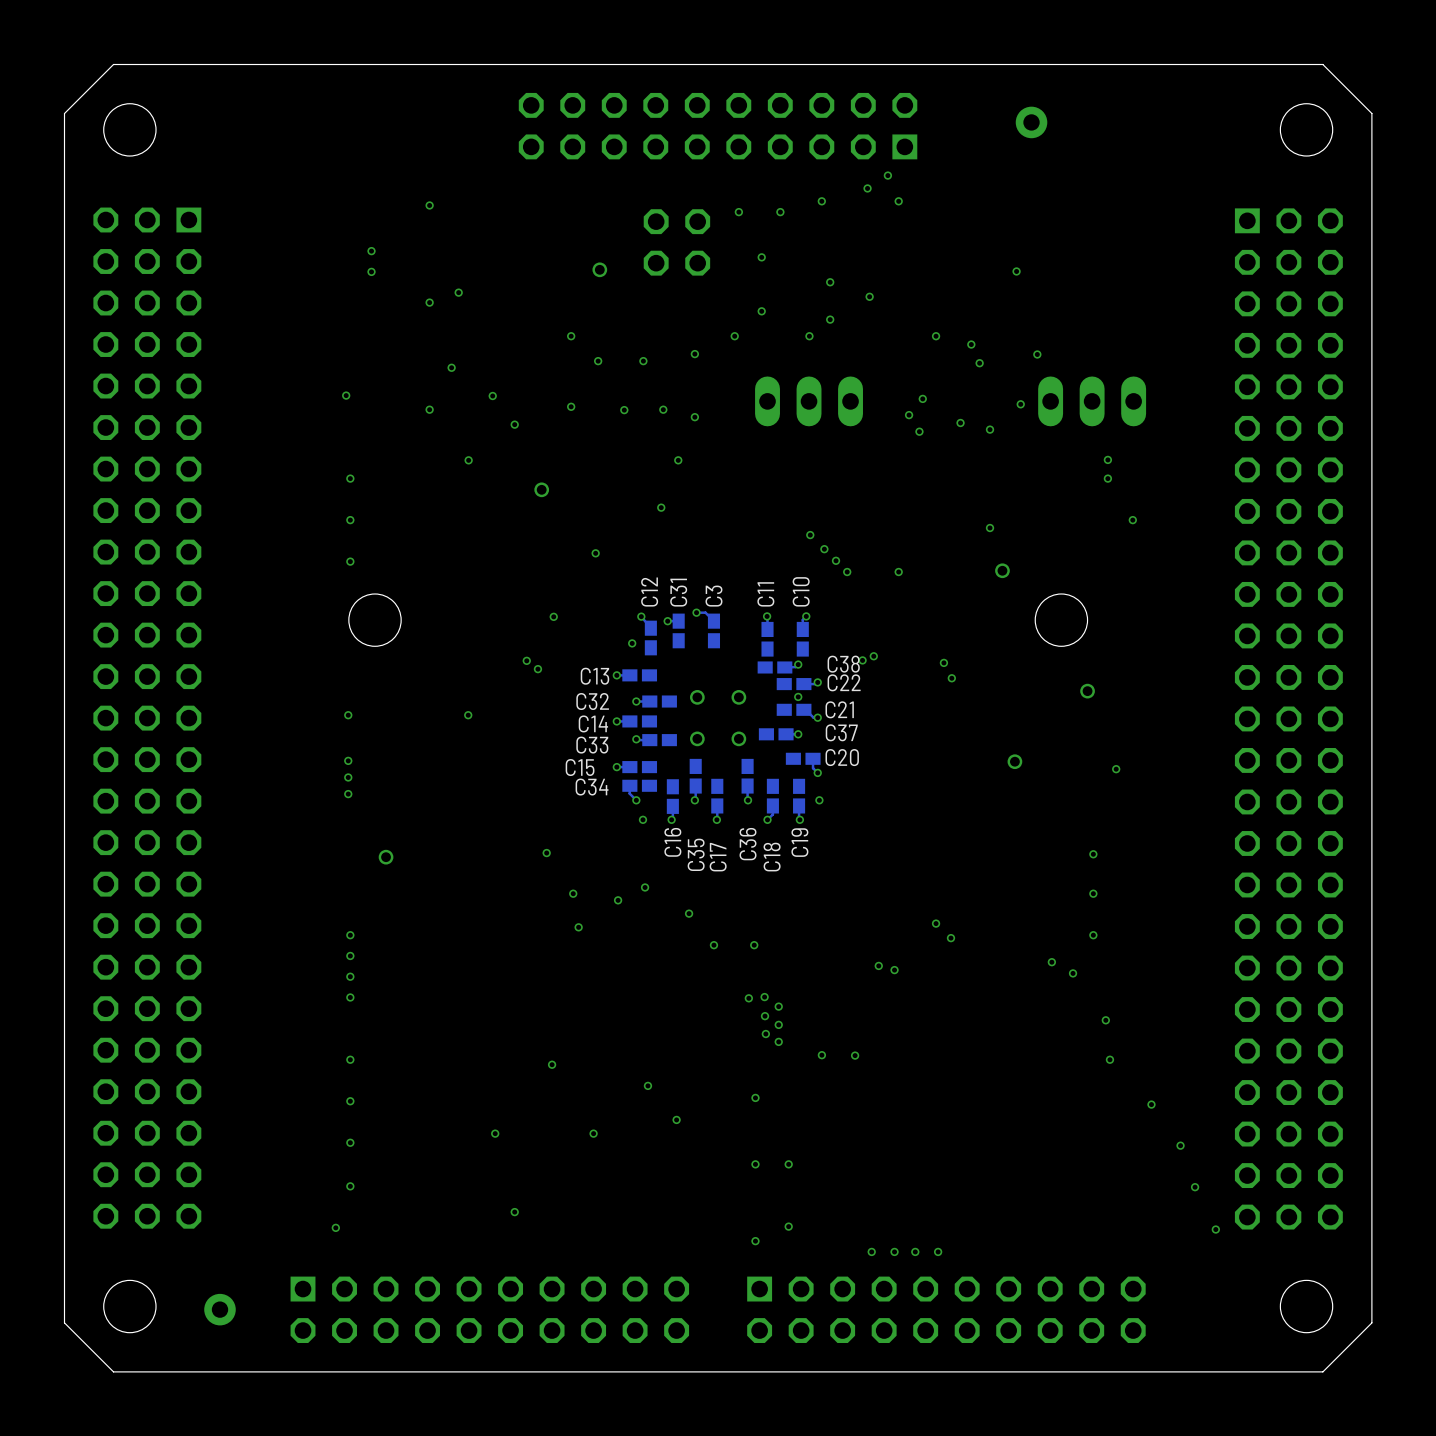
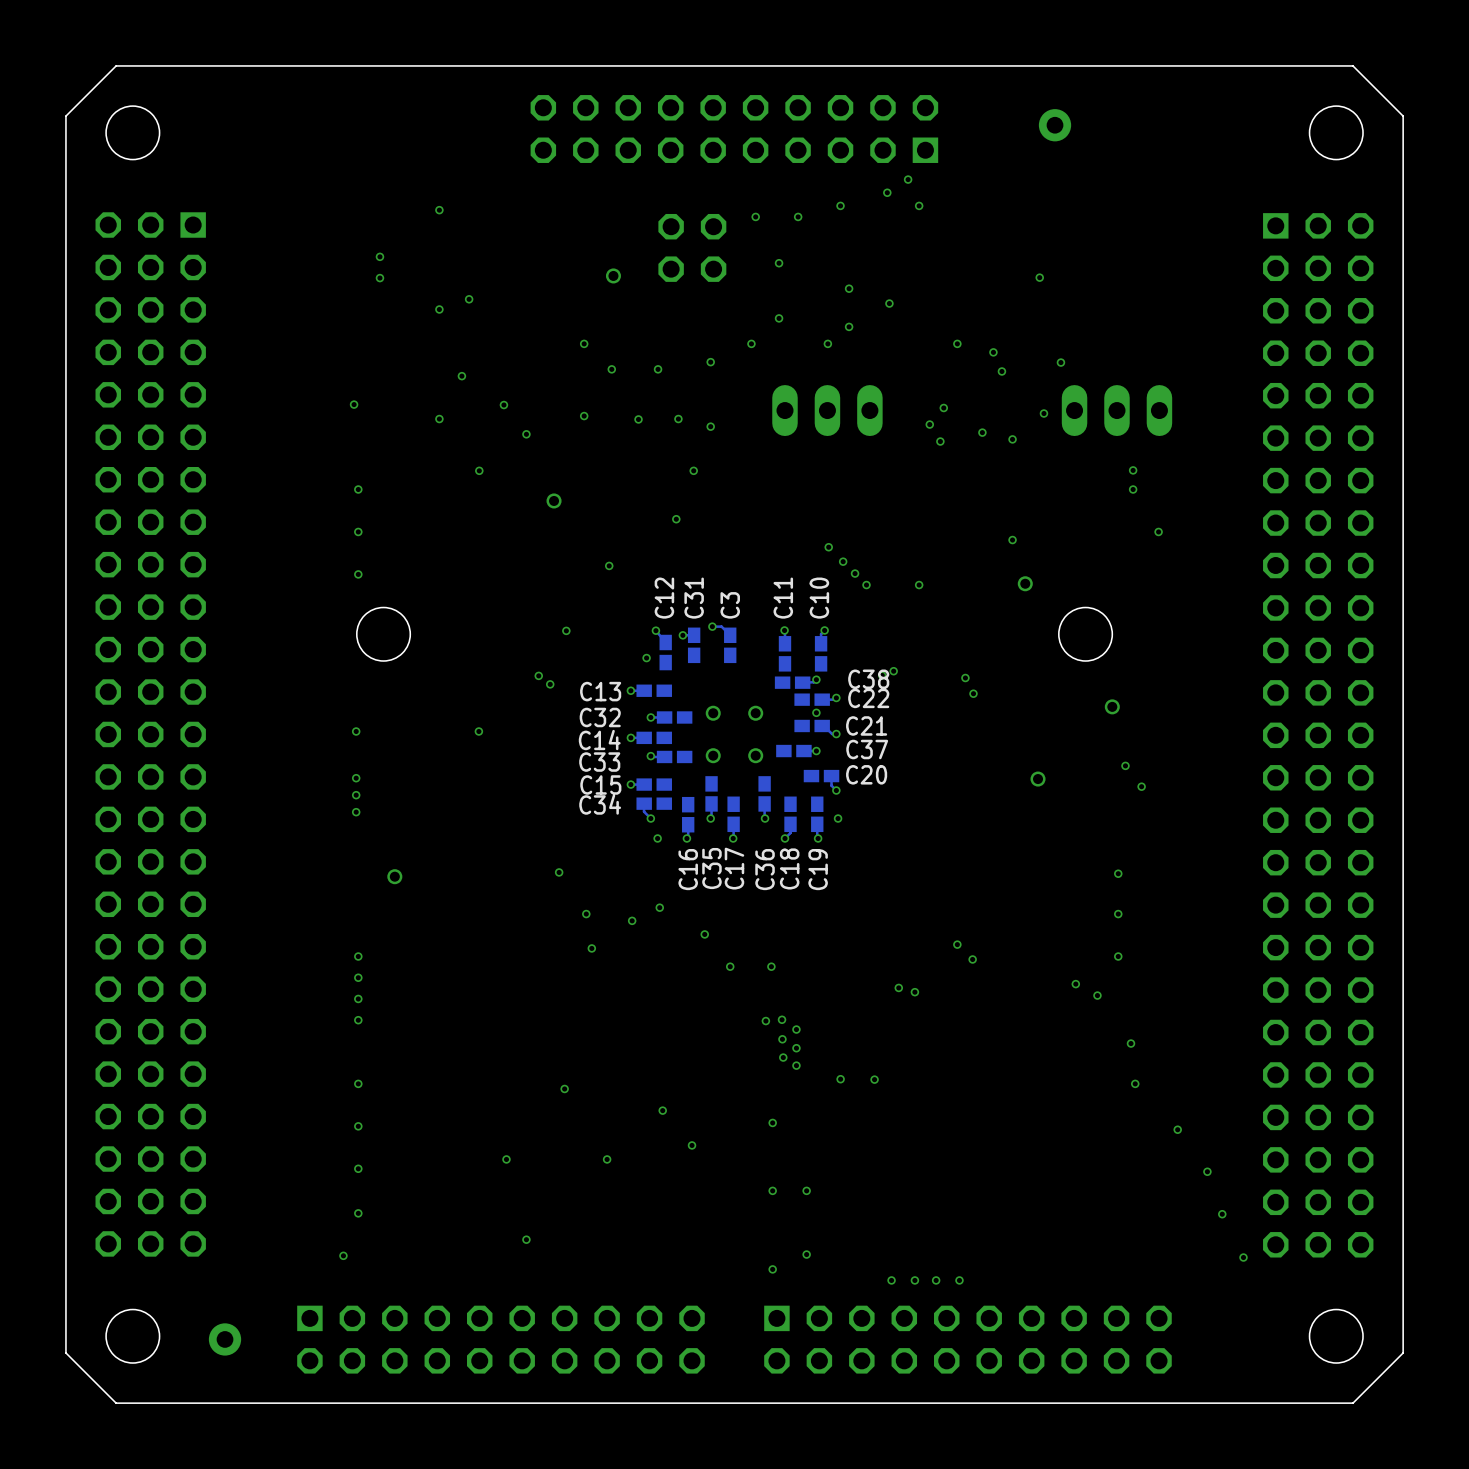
via: none -> (1125, 765)

